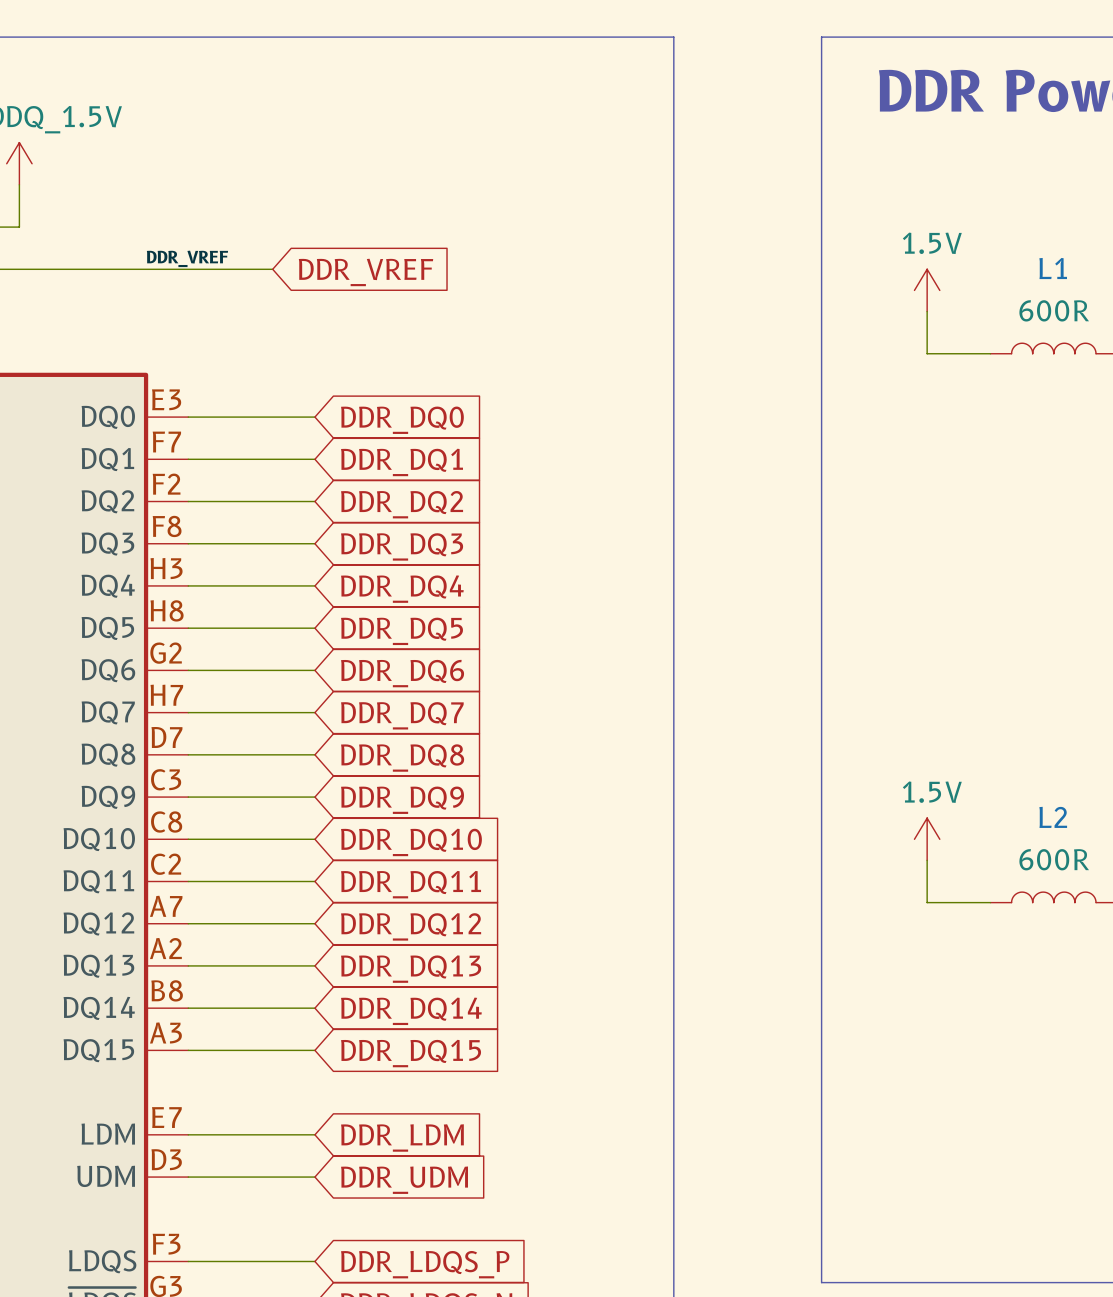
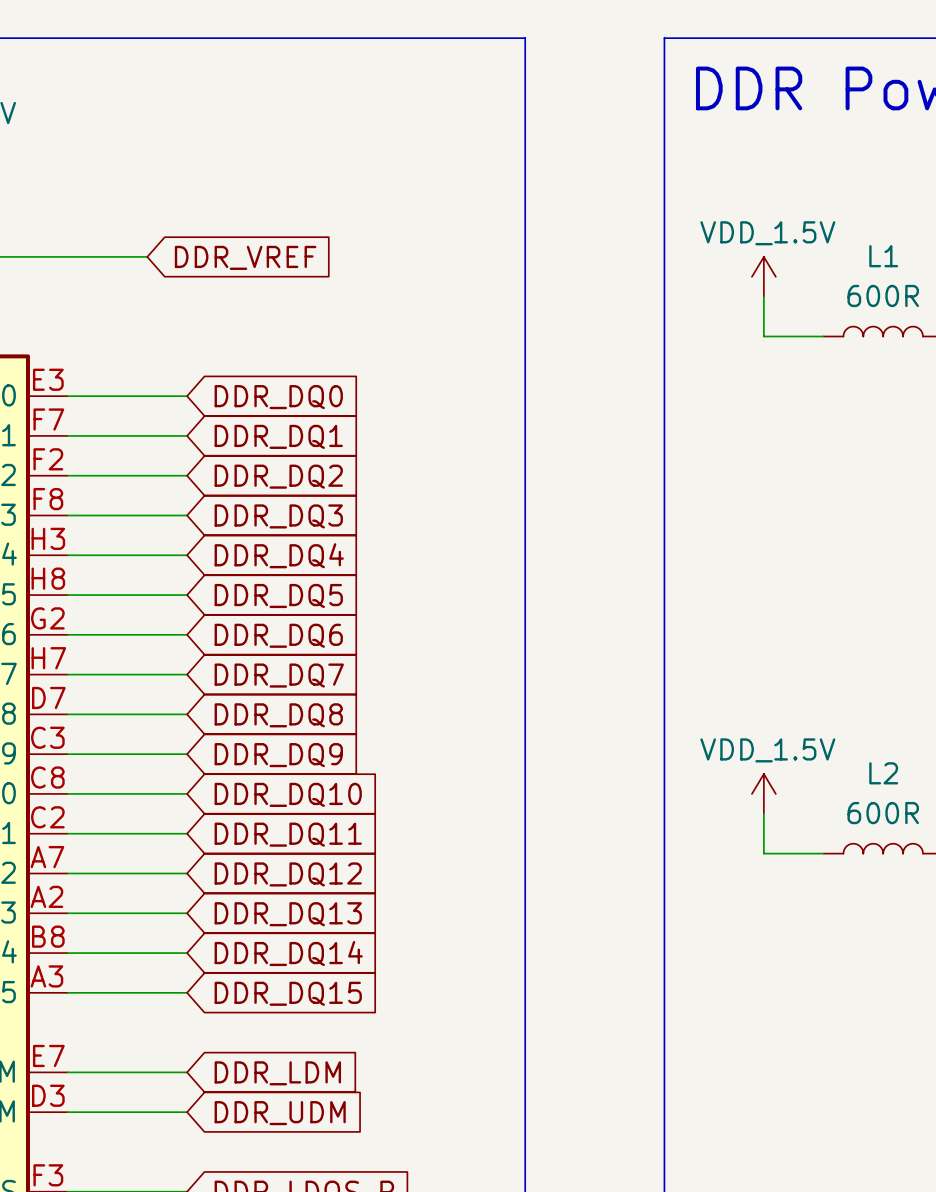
label: DDR_VREF (187, 258) -> none
power symbol: 1.5V (927, 290) -> VDD_1.5V (763, 276)
power symbol: 1.5V (927, 839) -> VDD_1.5V (763, 793)

